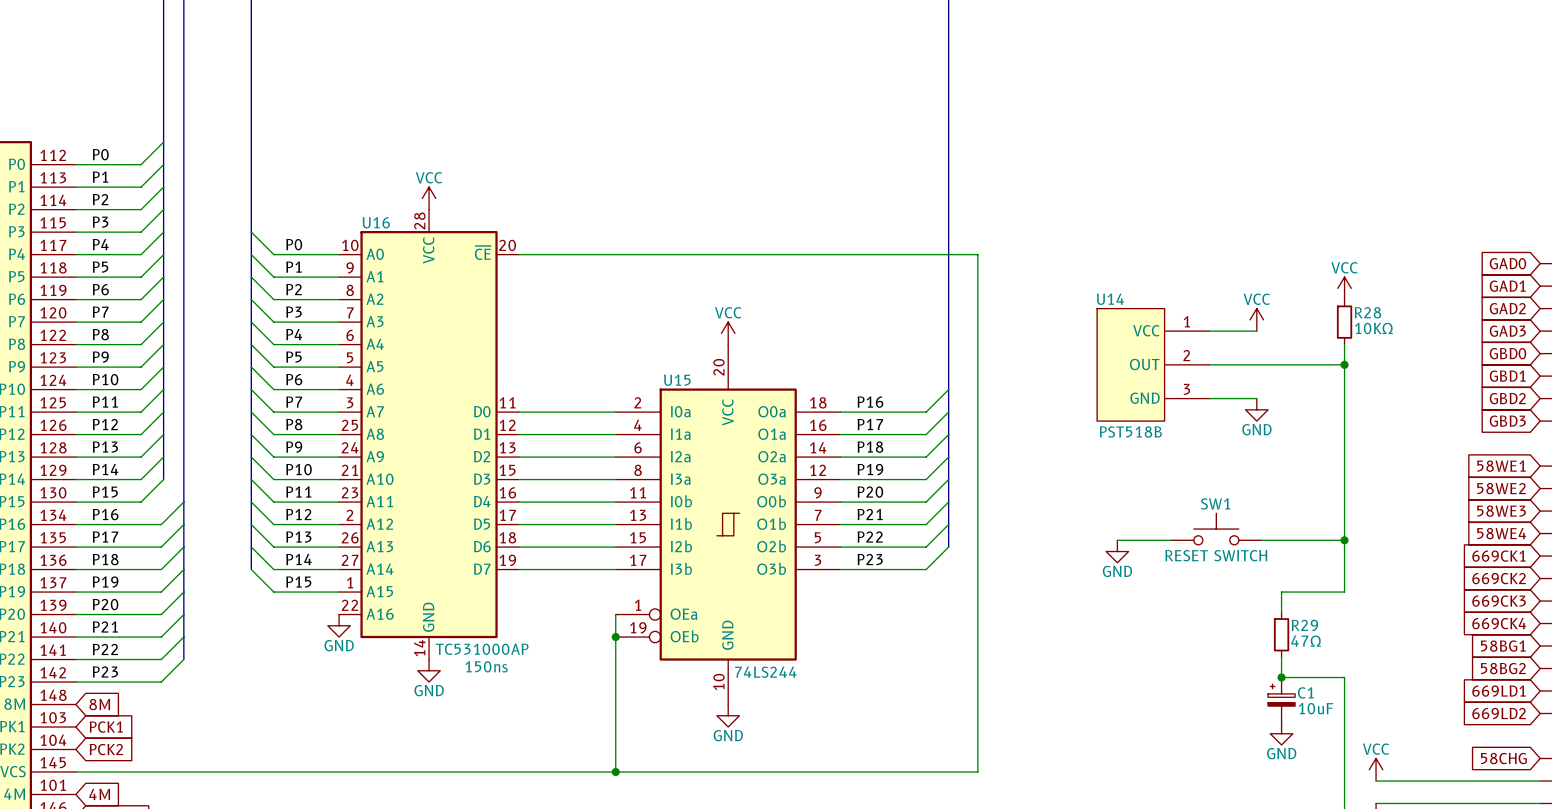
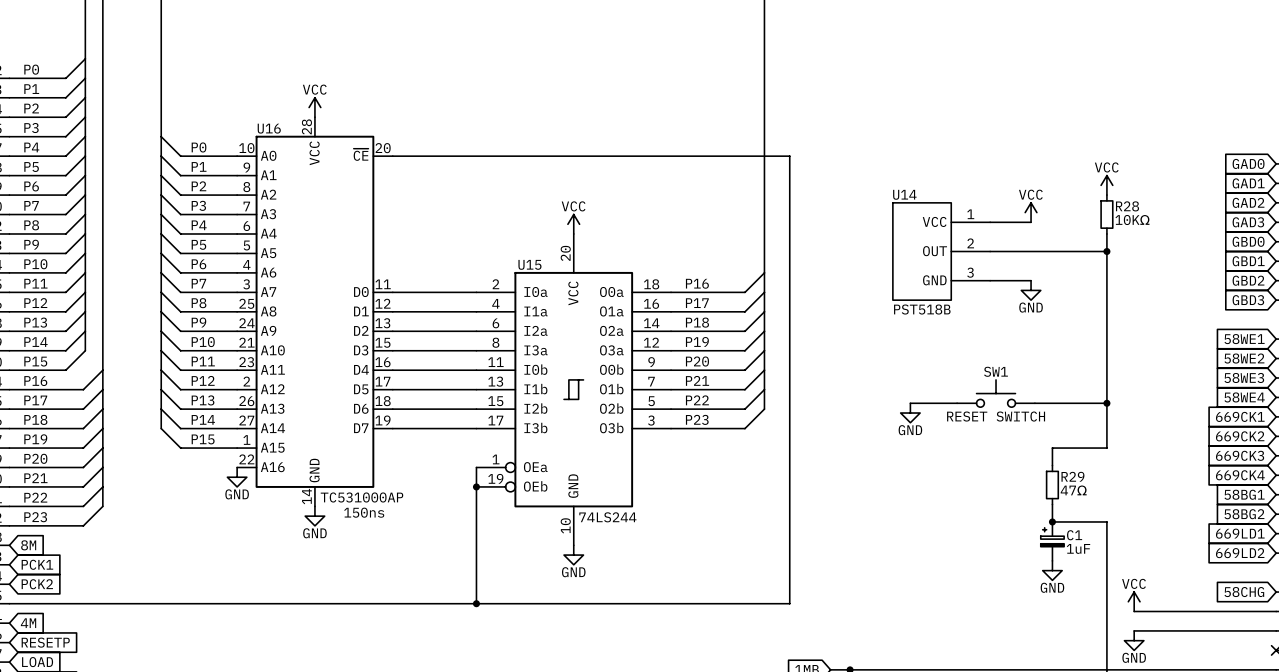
C1 value: 10uF (1315, 708) -> 1uF (1078, 548)

